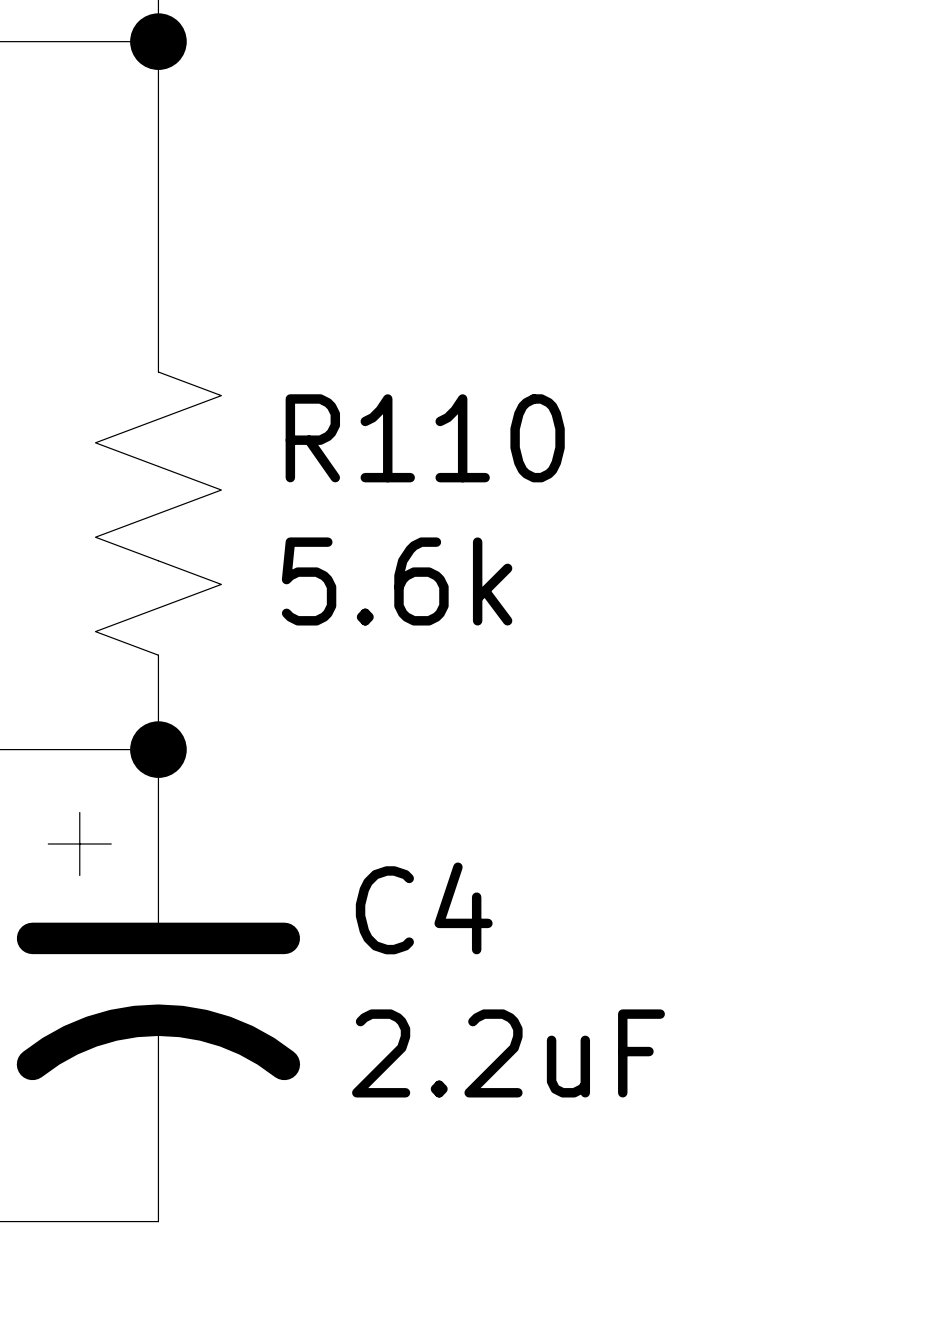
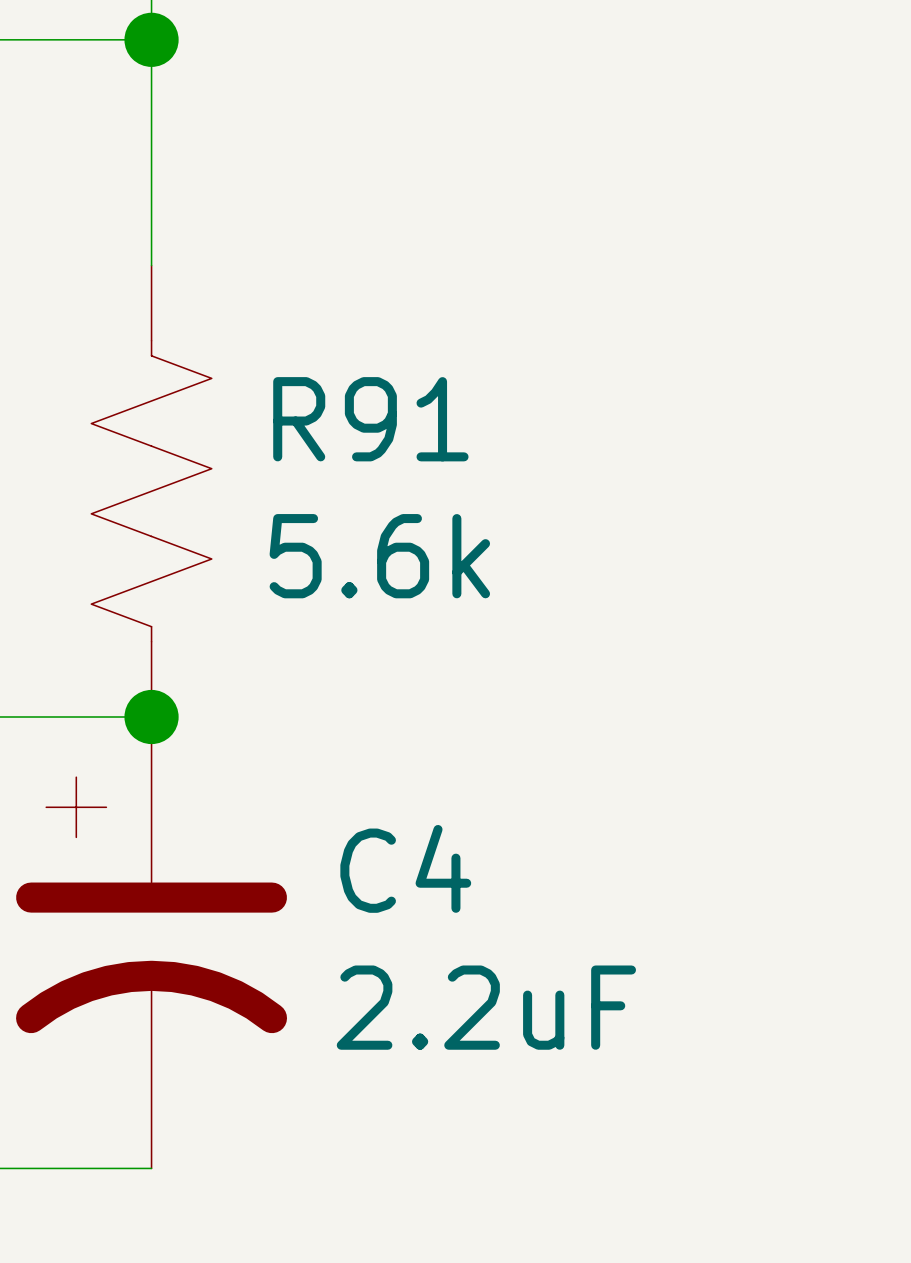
R110 name: R110 (425, 438) -> R91 (370, 419)

